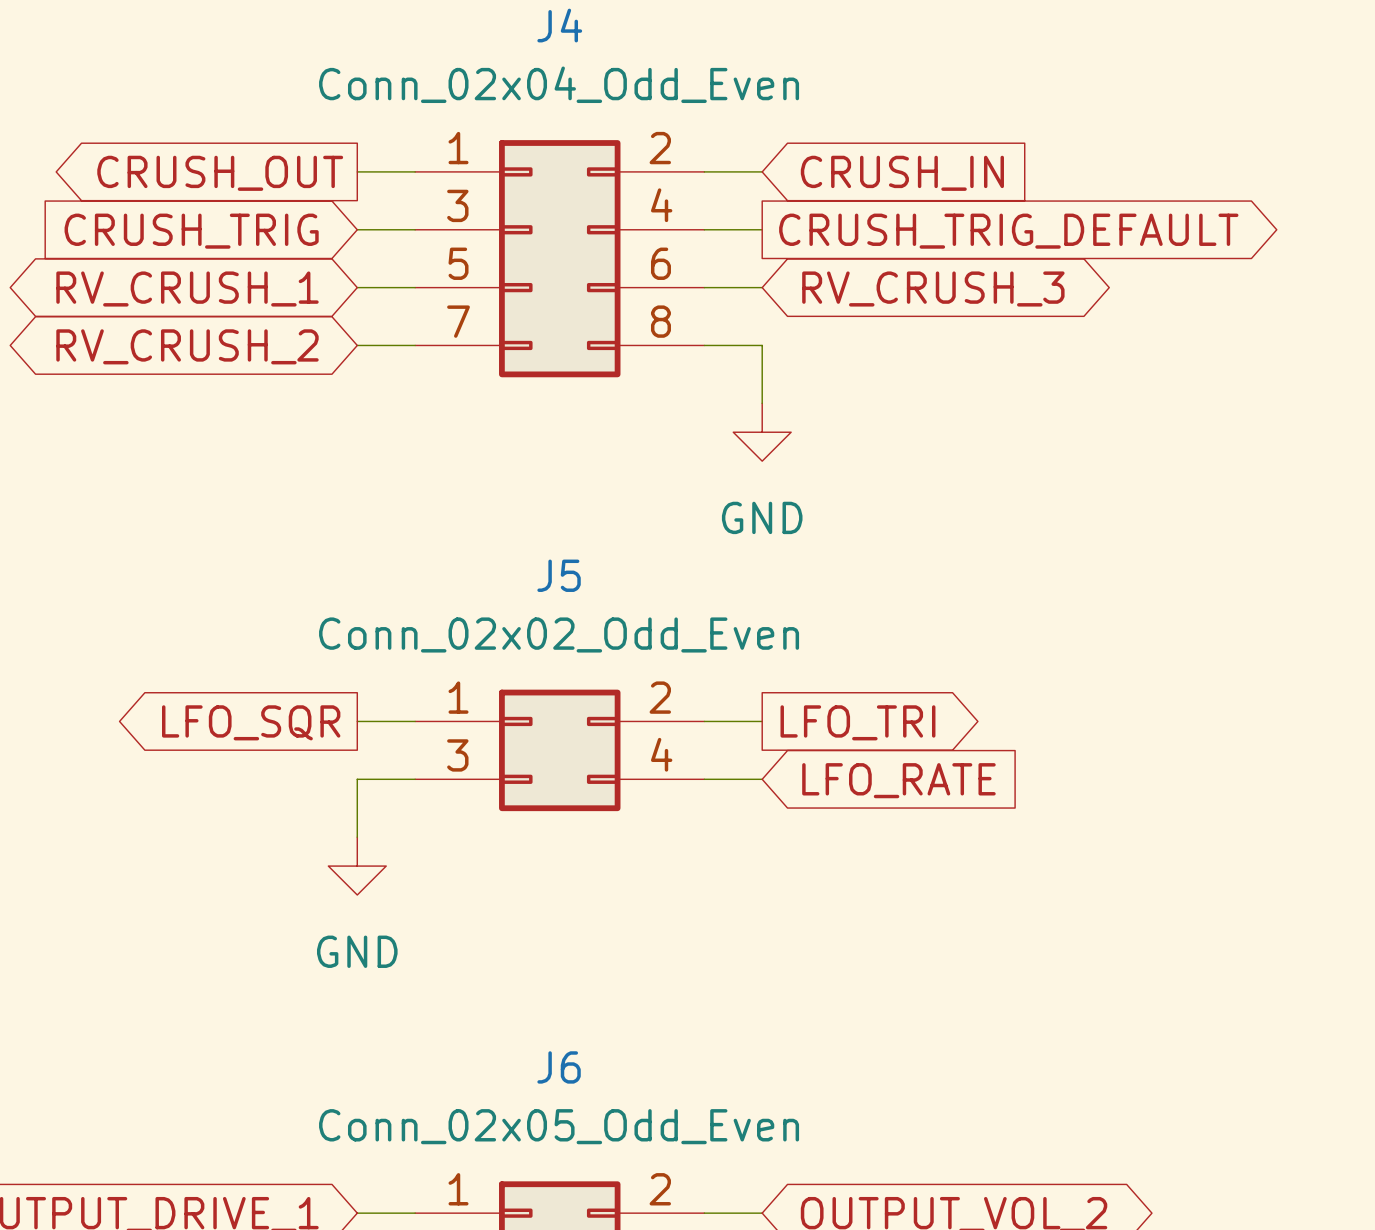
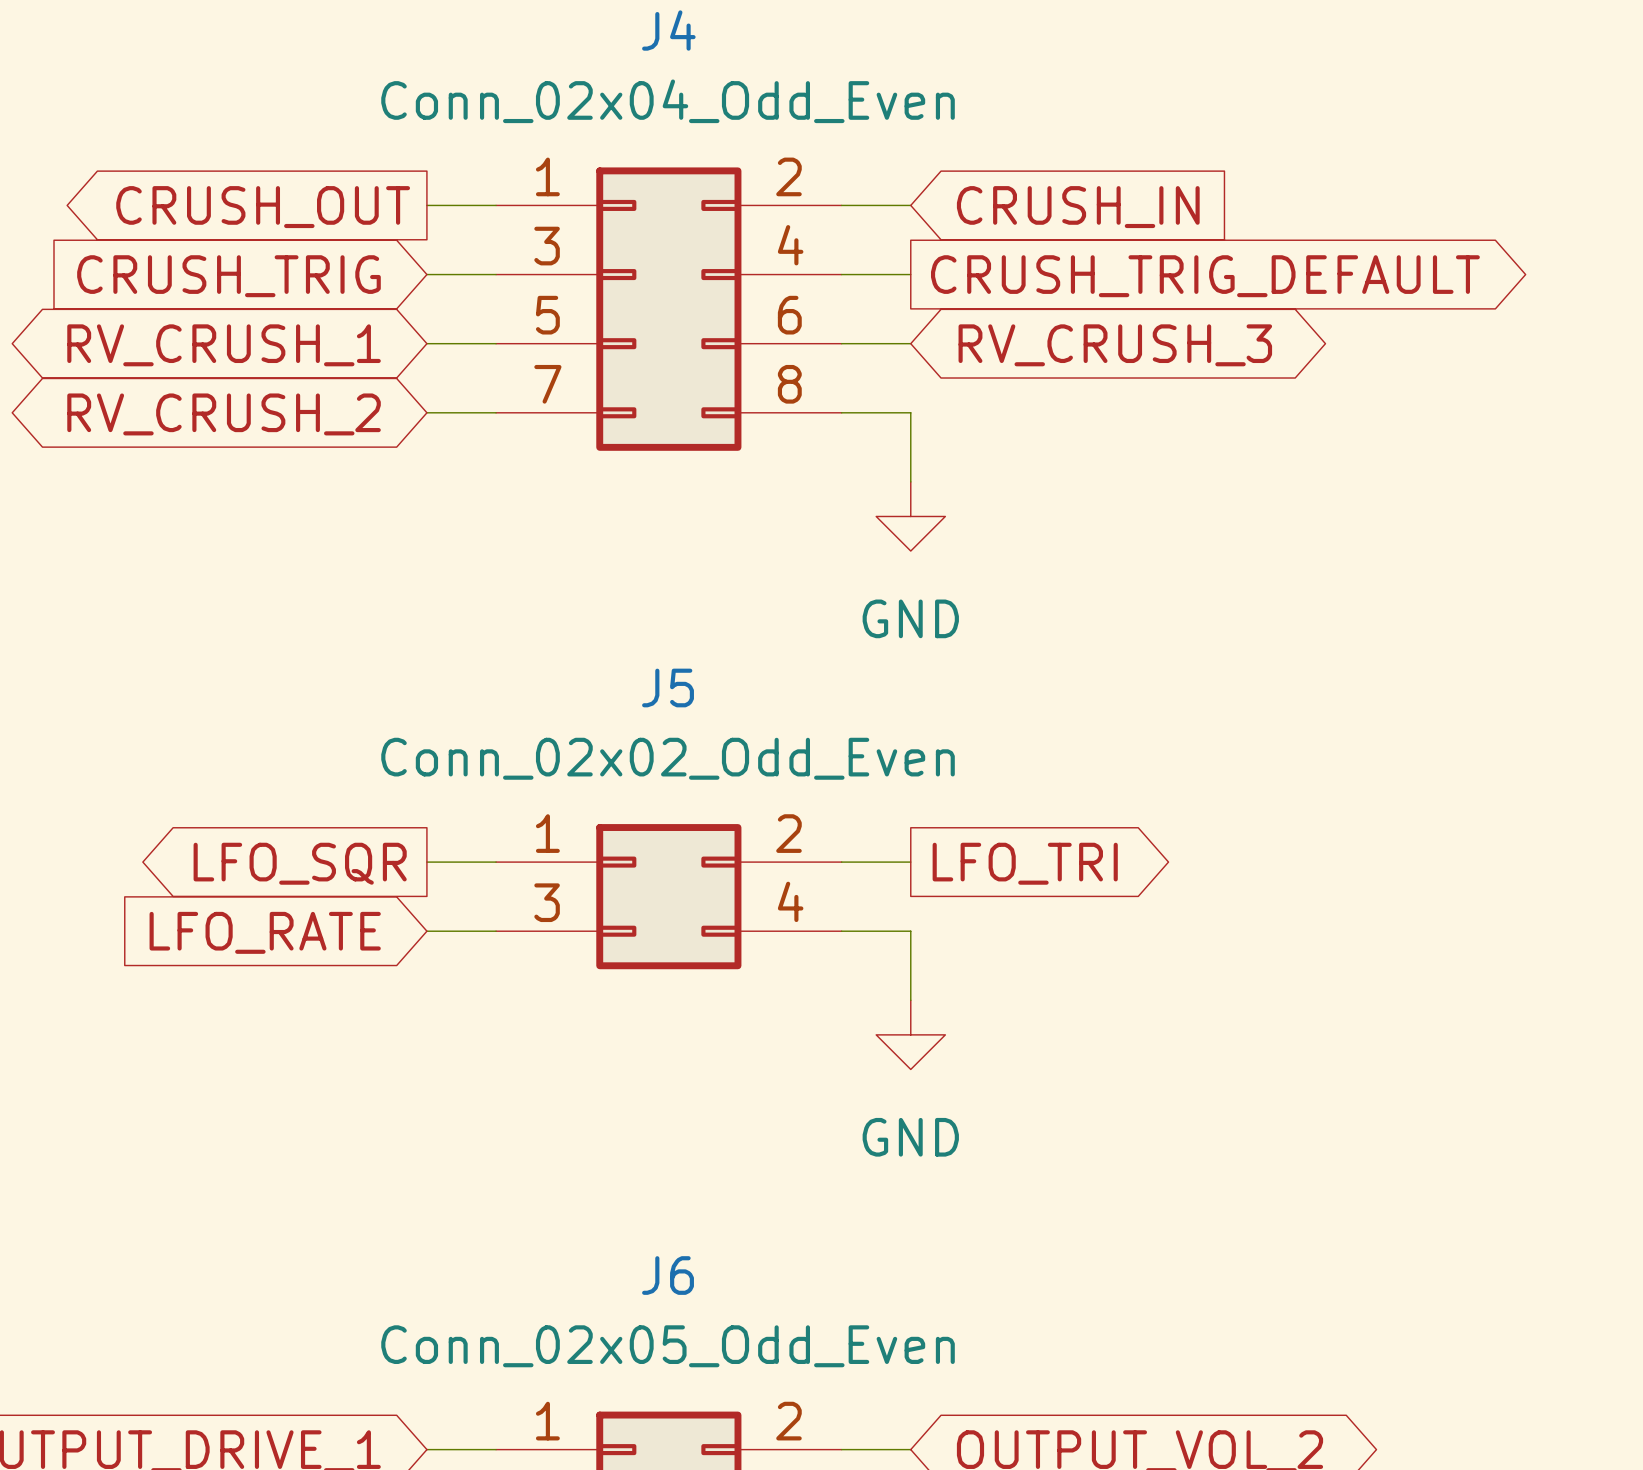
wire: (357, 779) (357, 837) -> (910, 931) (910, 1000)
global label rotation: 0° (898, 780) -> 180° (265, 932)
global label position: LFO_RATE (898, 780) -> LFO_RATE (265, 932)
power symbol position: GND (357, 866) -> GND (910, 1034)

